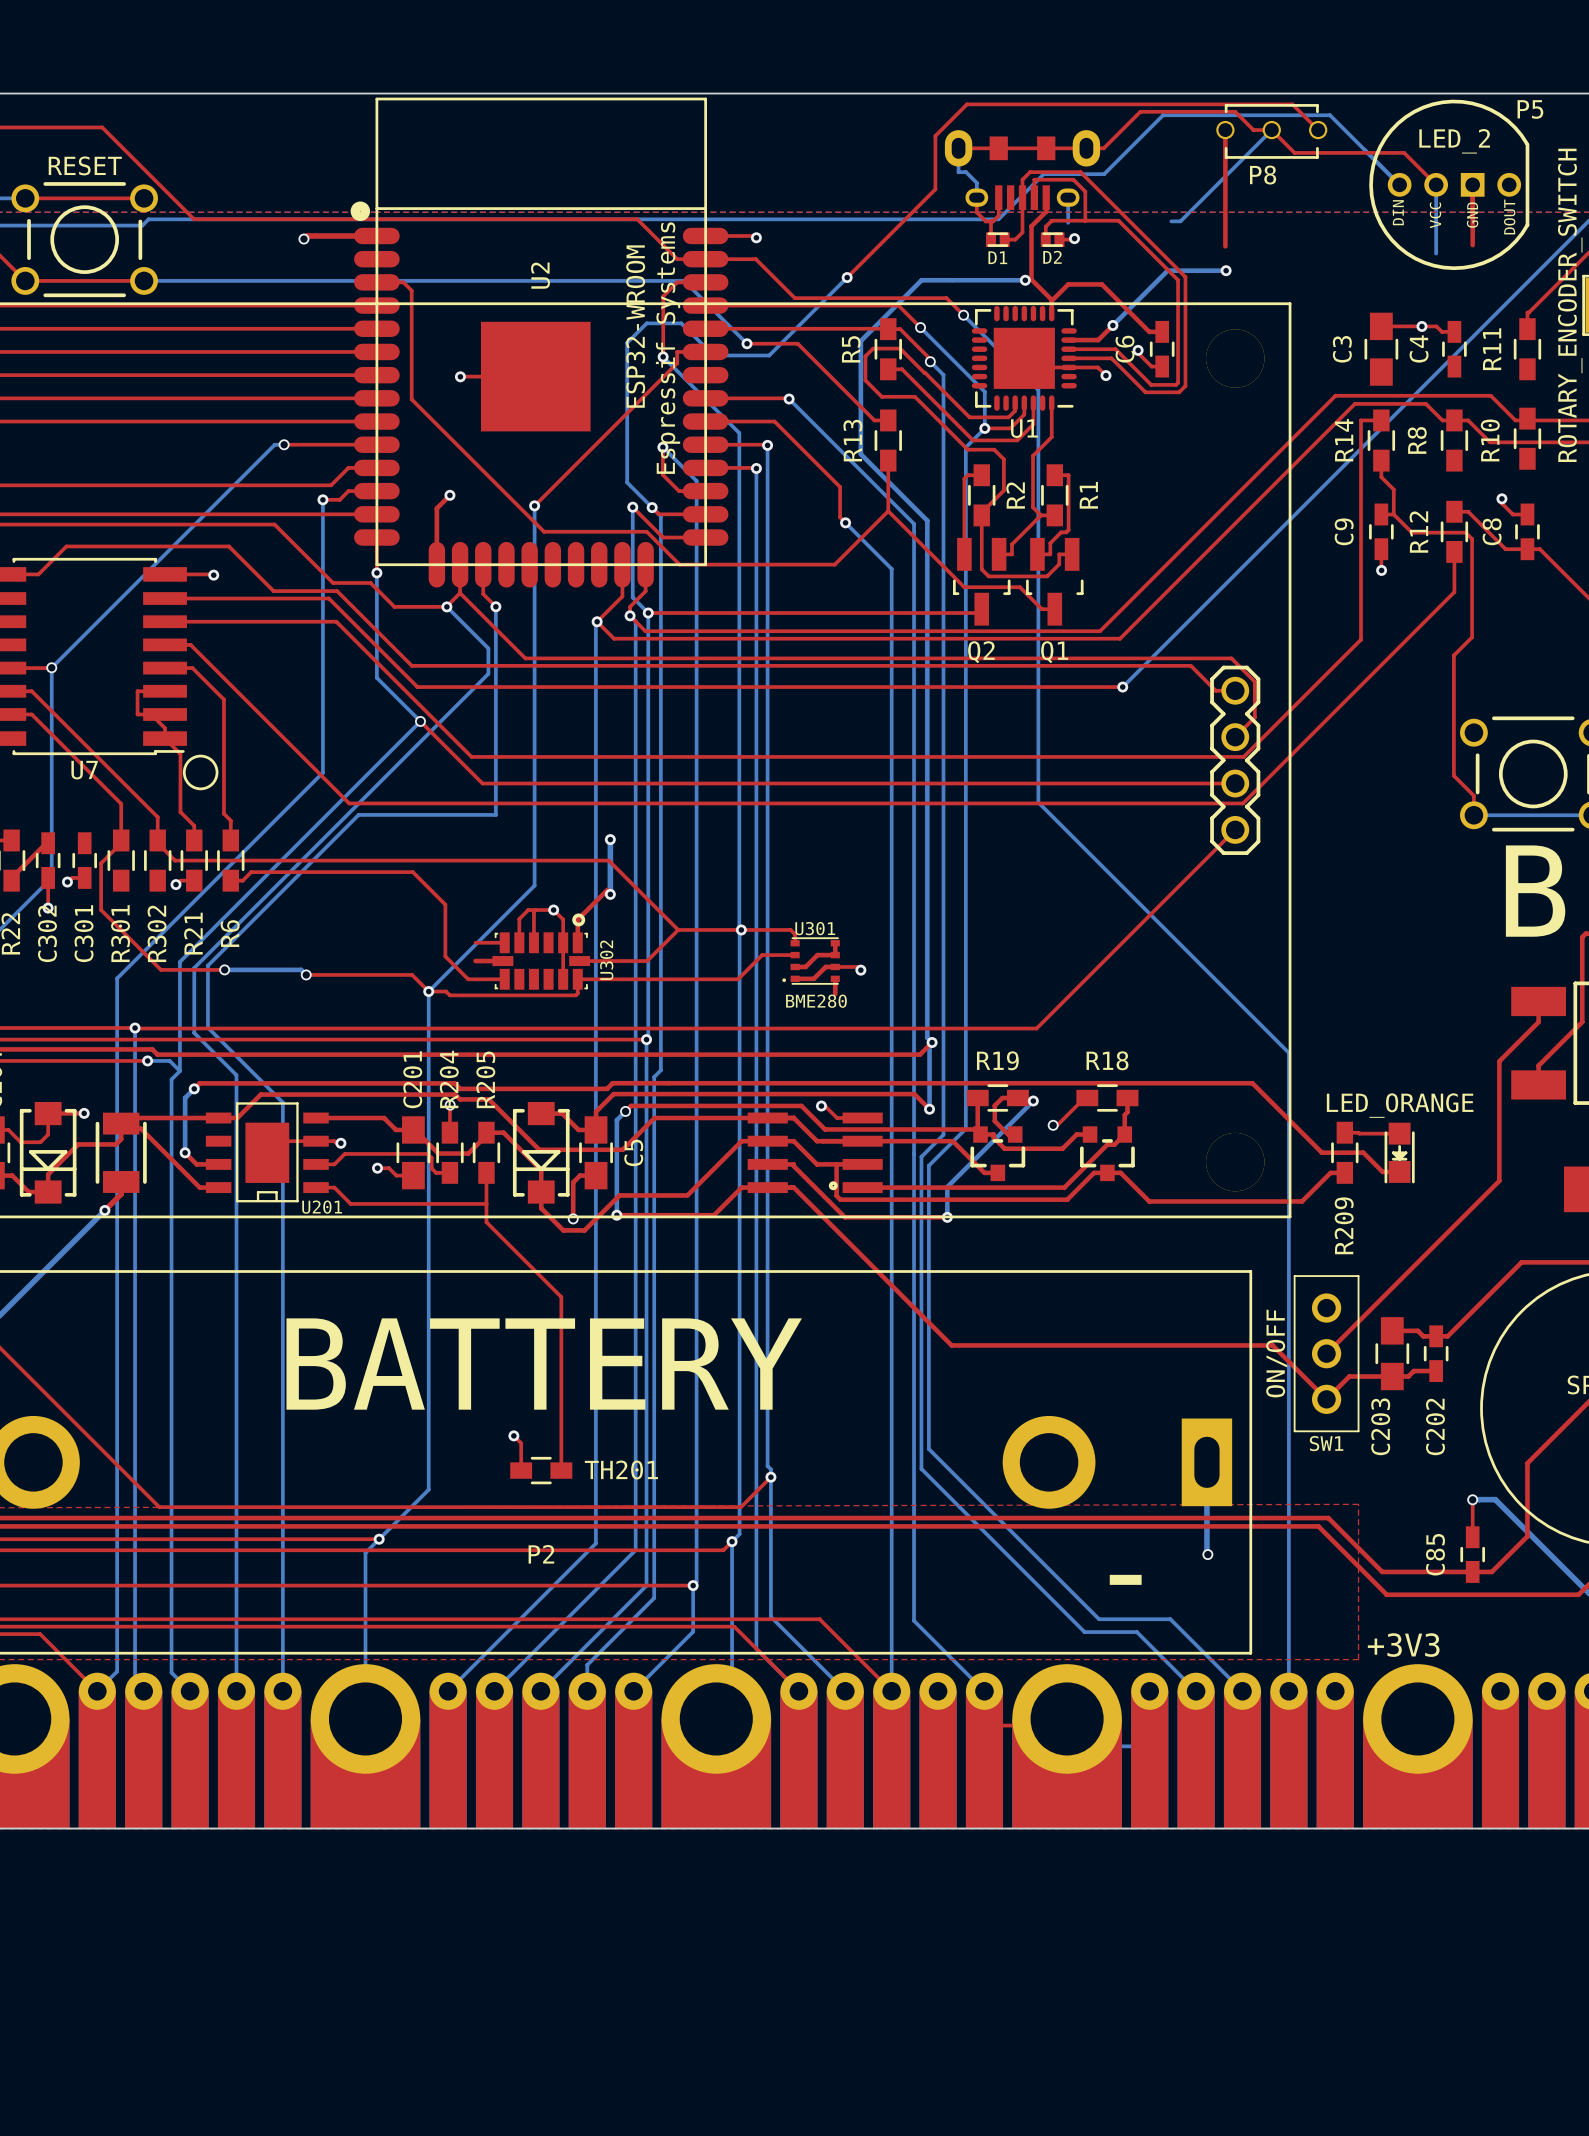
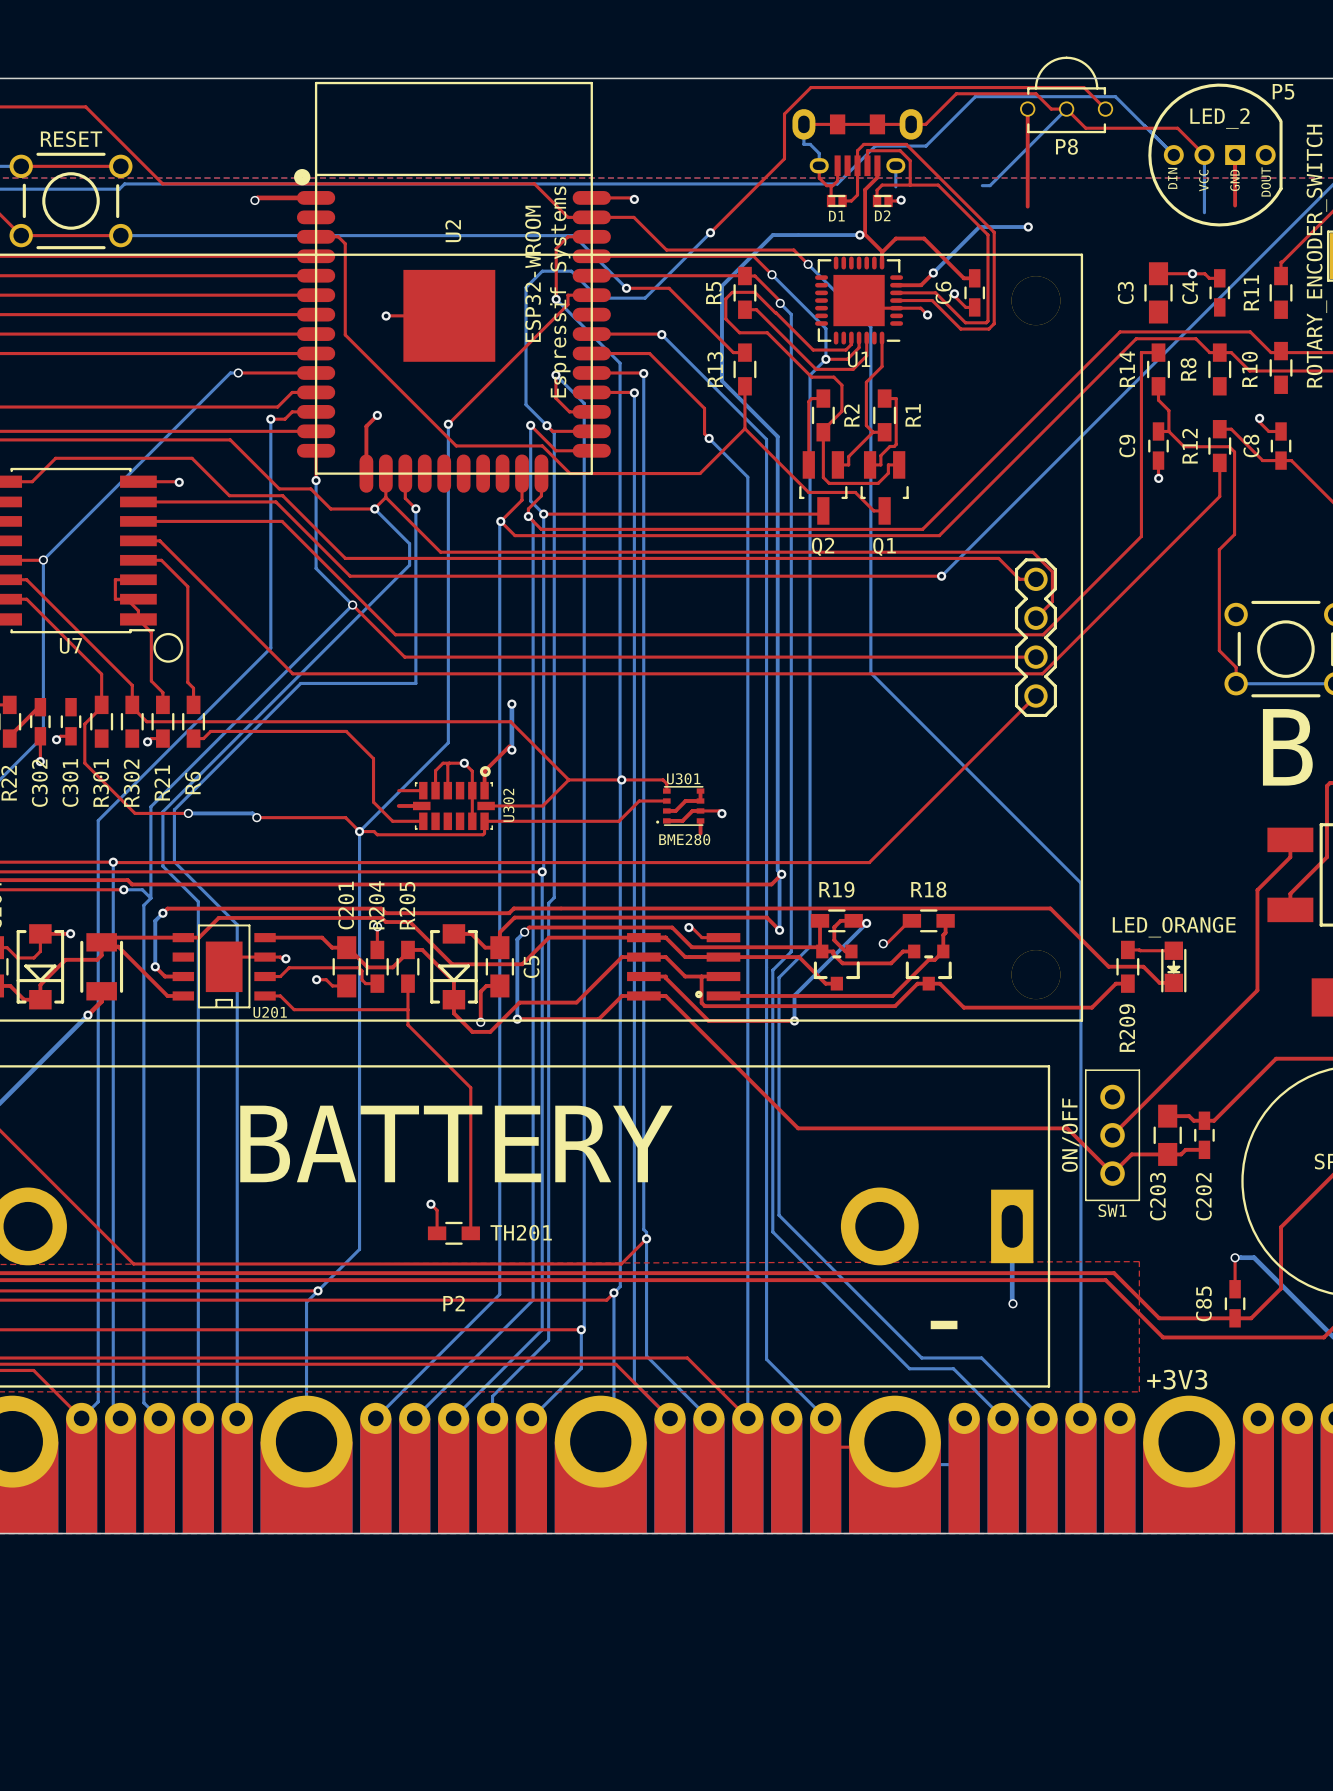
P8 footprint: [1216, 104, 1328, 159] -> [1020, 56, 1114, 134]

